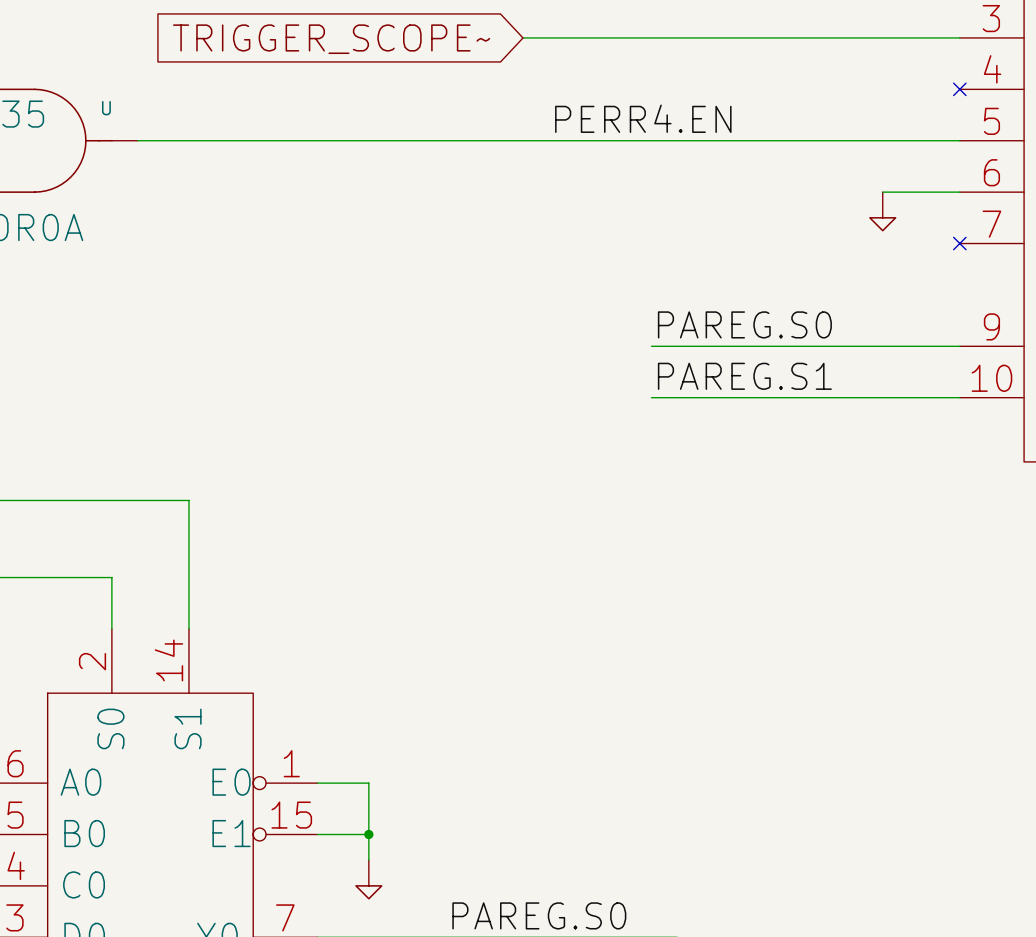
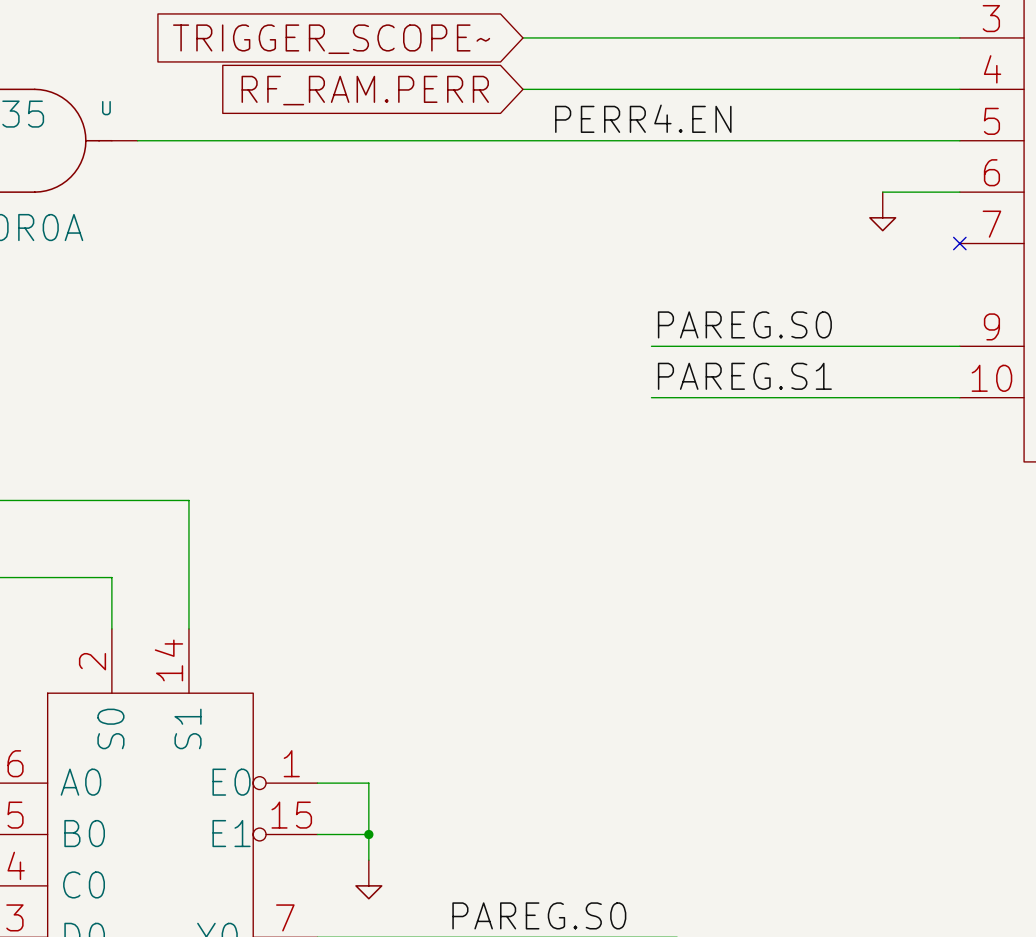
wire: none -> (523, 89) (959, 89)
no-connect mark: (959, 89) -> none
global label: none -> RF_RAM.PERR (365, 90)

